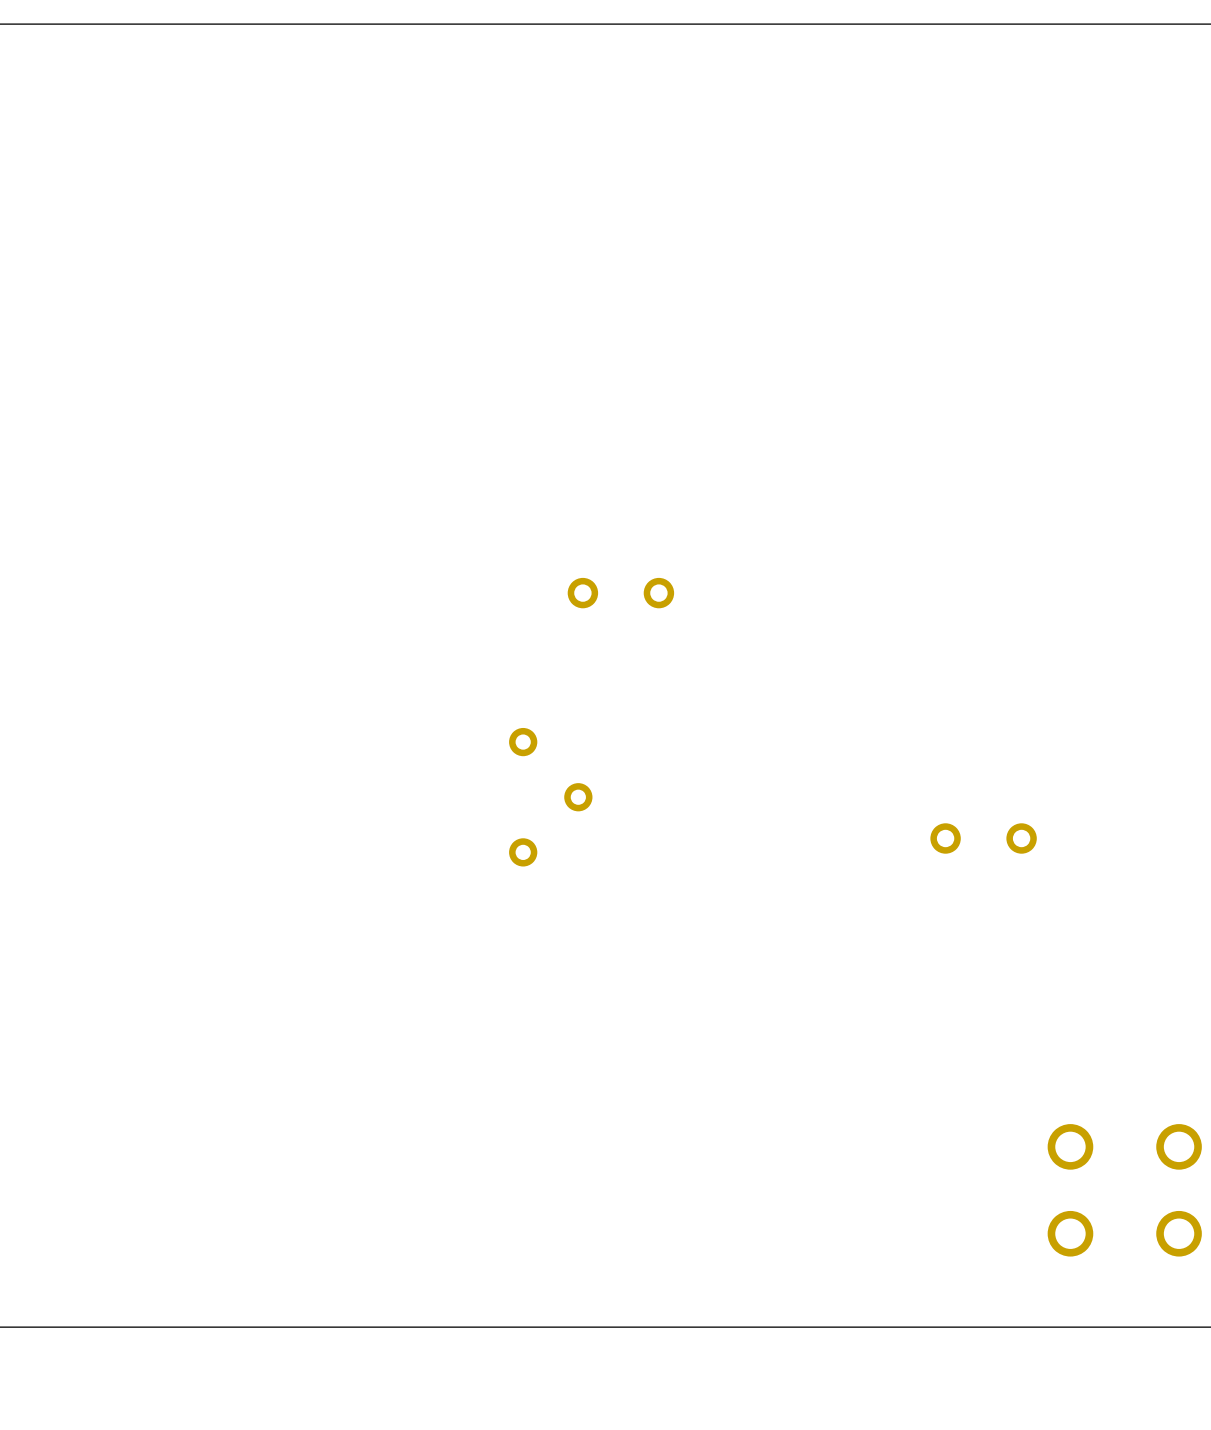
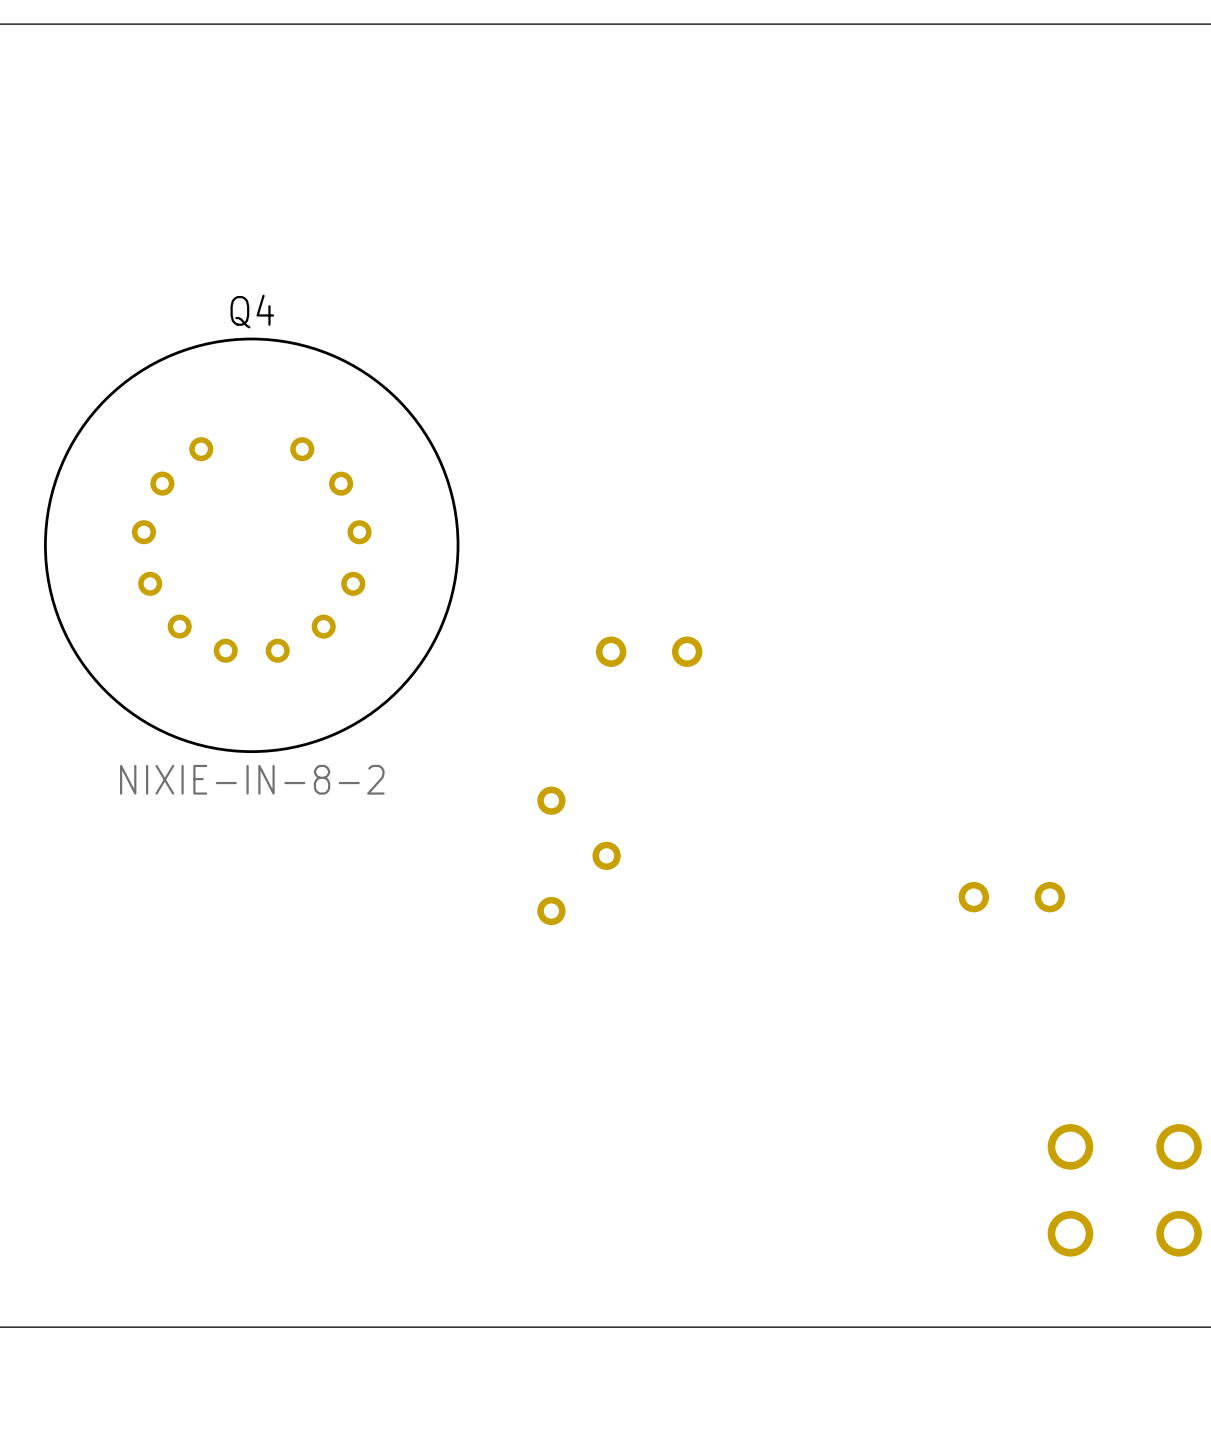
Q4: none -> NIXIE-IN-8-2 (251, 545)
part position: (620, 593) -> (649, 651)
part position: (550, 797) -> (579, 855)
part position: (983, 838) -> (1011, 897)

